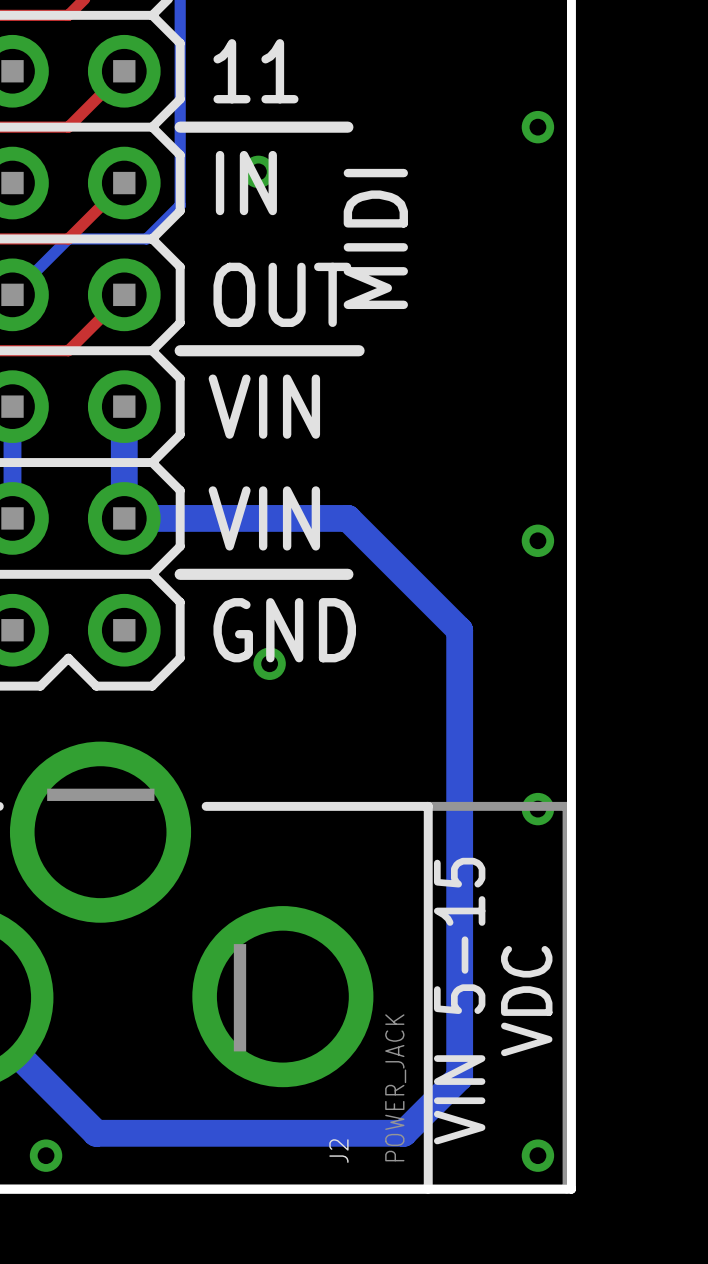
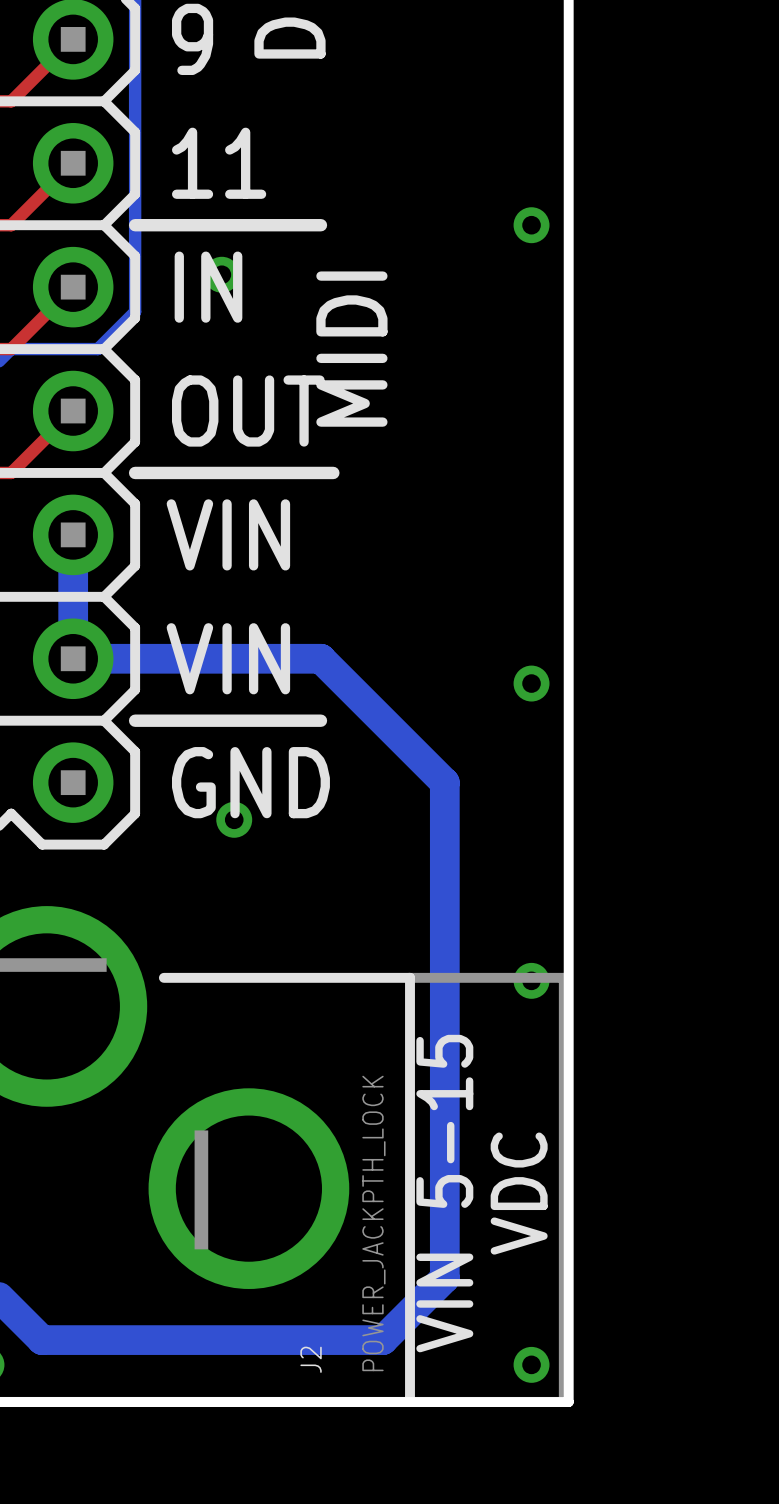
J2 value: POWER_JACK (395, 1087) -> POWER_JACKPTH_LOCK (373, 1223)

